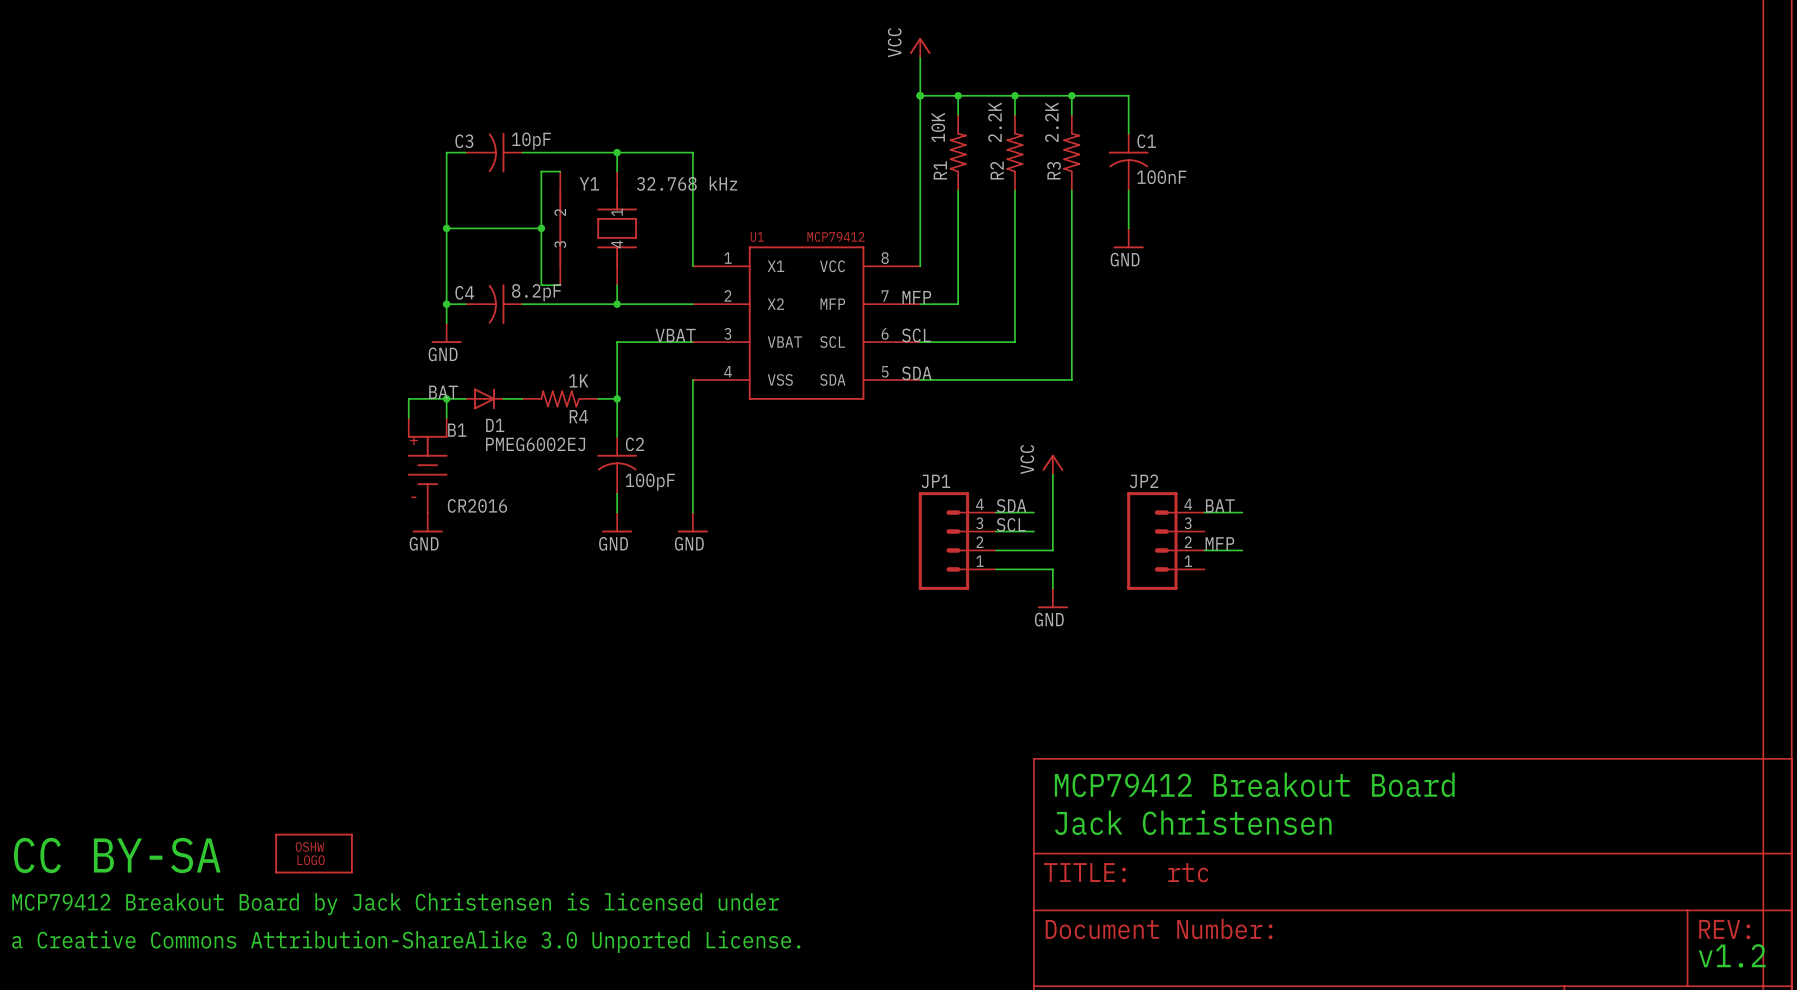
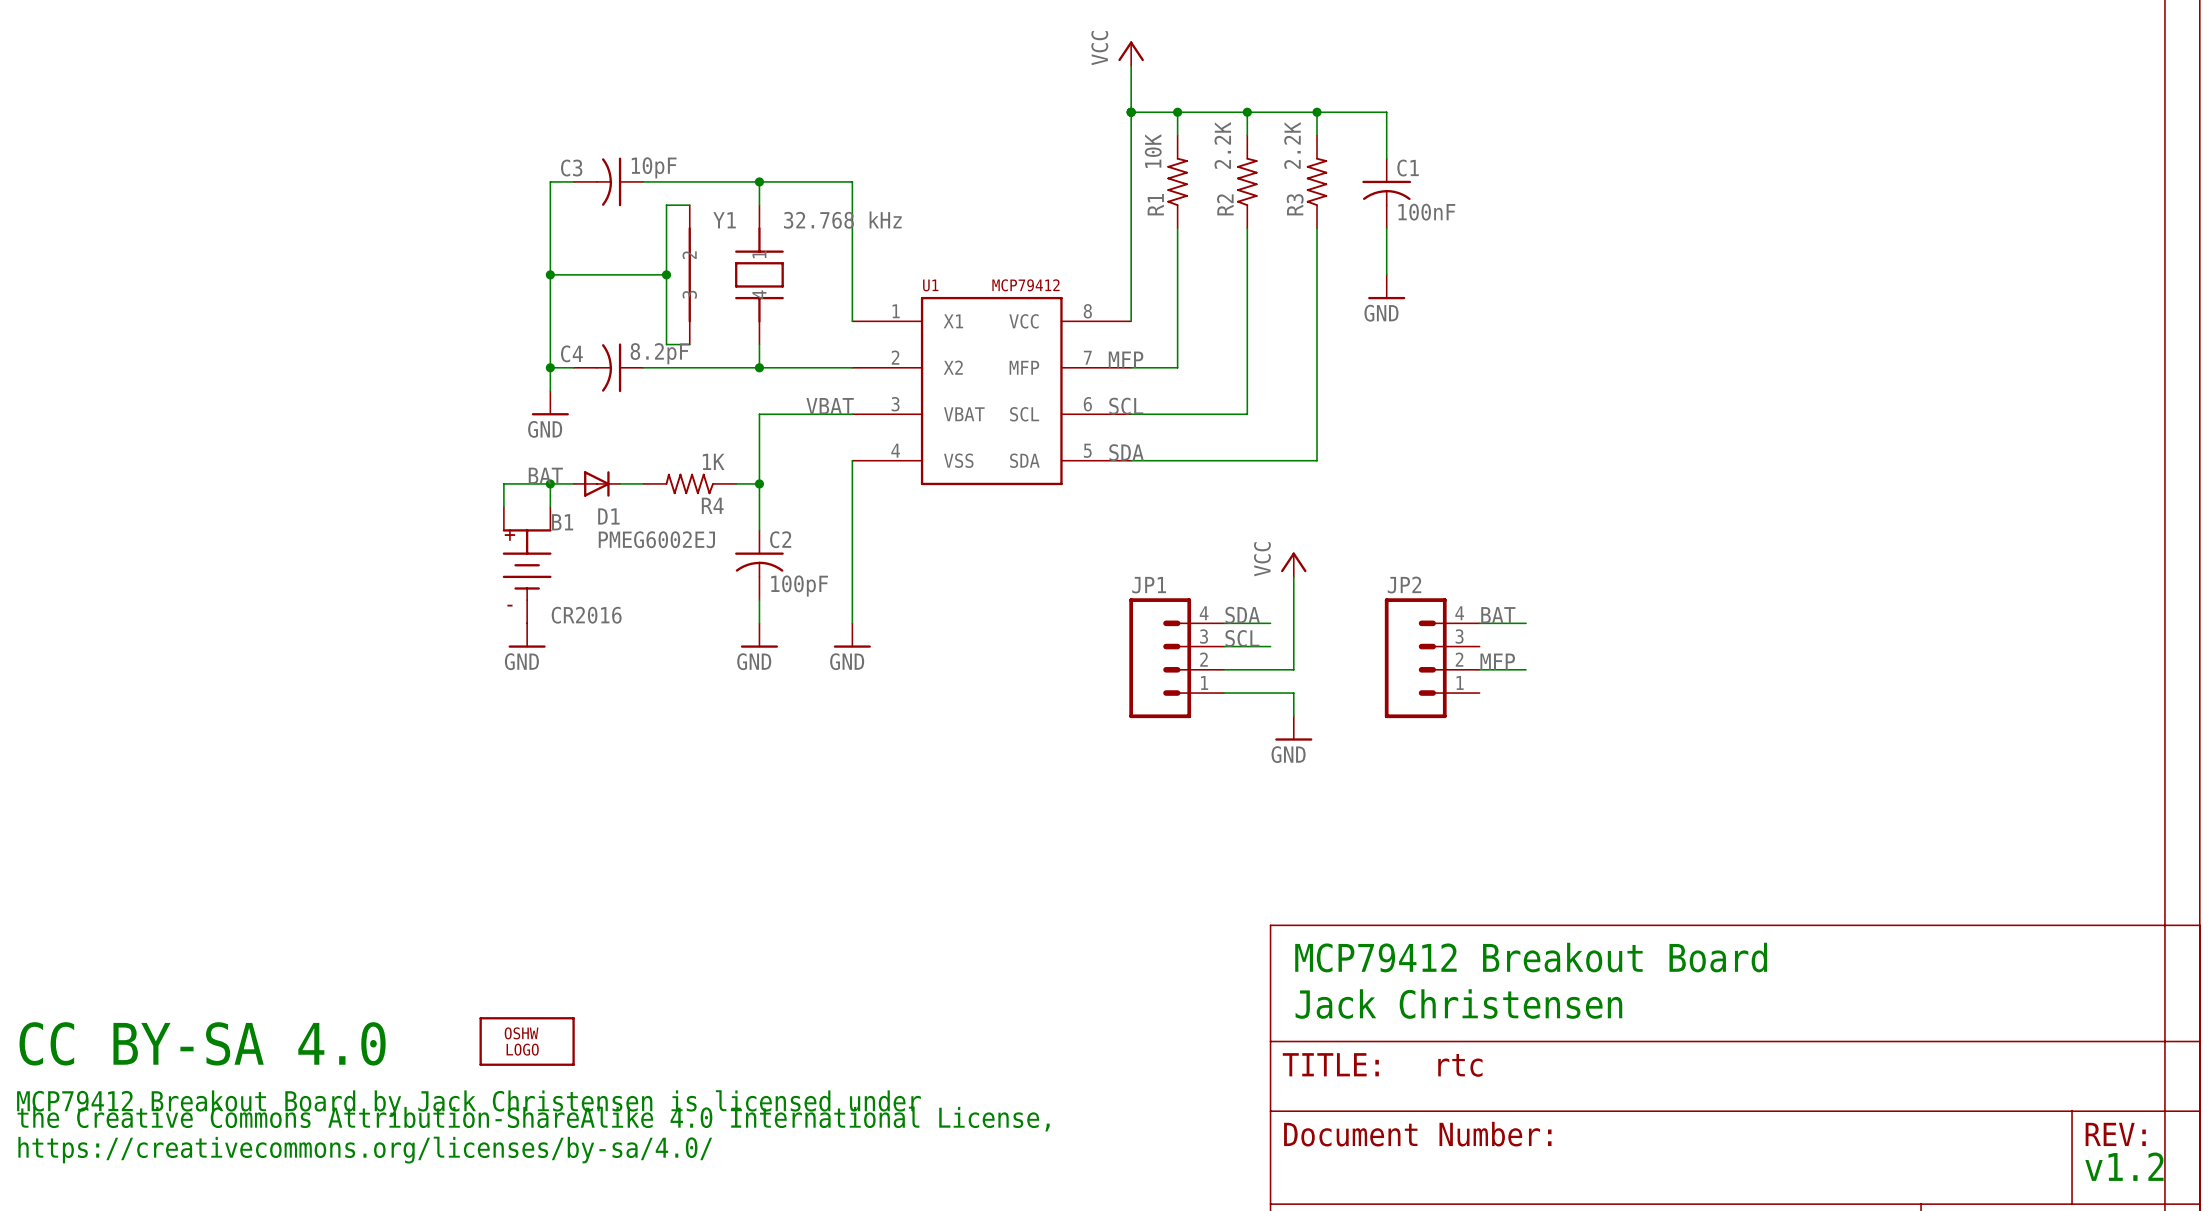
part position: (314, 853) -> (527, 1041)
text: CC BY-SA (117, 855) -> CC BY-SA 4.0 (202, 1043)
text: none -> the Creative Commons Attribution-ShareAlike 4.0 International License, (533, 1119)
text: a Creative Commons Attribution-ShareAlike 3.0 Unported License. (406, 941) -> https://creativecommons.org/licenses/by-sa/4.0/ (365, 1150)

